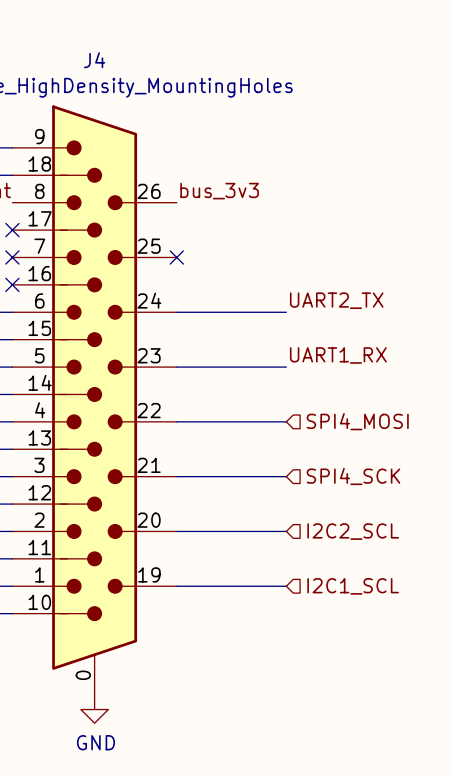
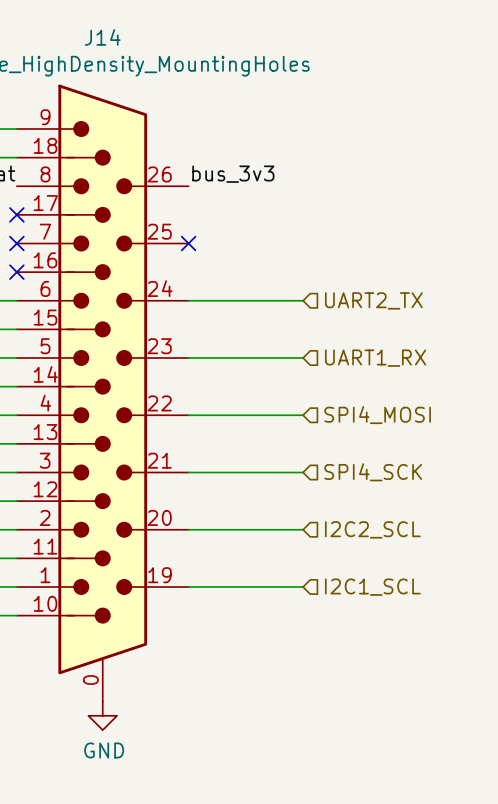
J4 name: J4 (94, 60) -> J14 (102, 37)
label: UART2_TX (336, 300) -> none
hierarchical label: none -> UART2_TX (373, 300)
label: UART1_RX (338, 355) -> none
hierarchical label: none -> UART1_RX (375, 358)

